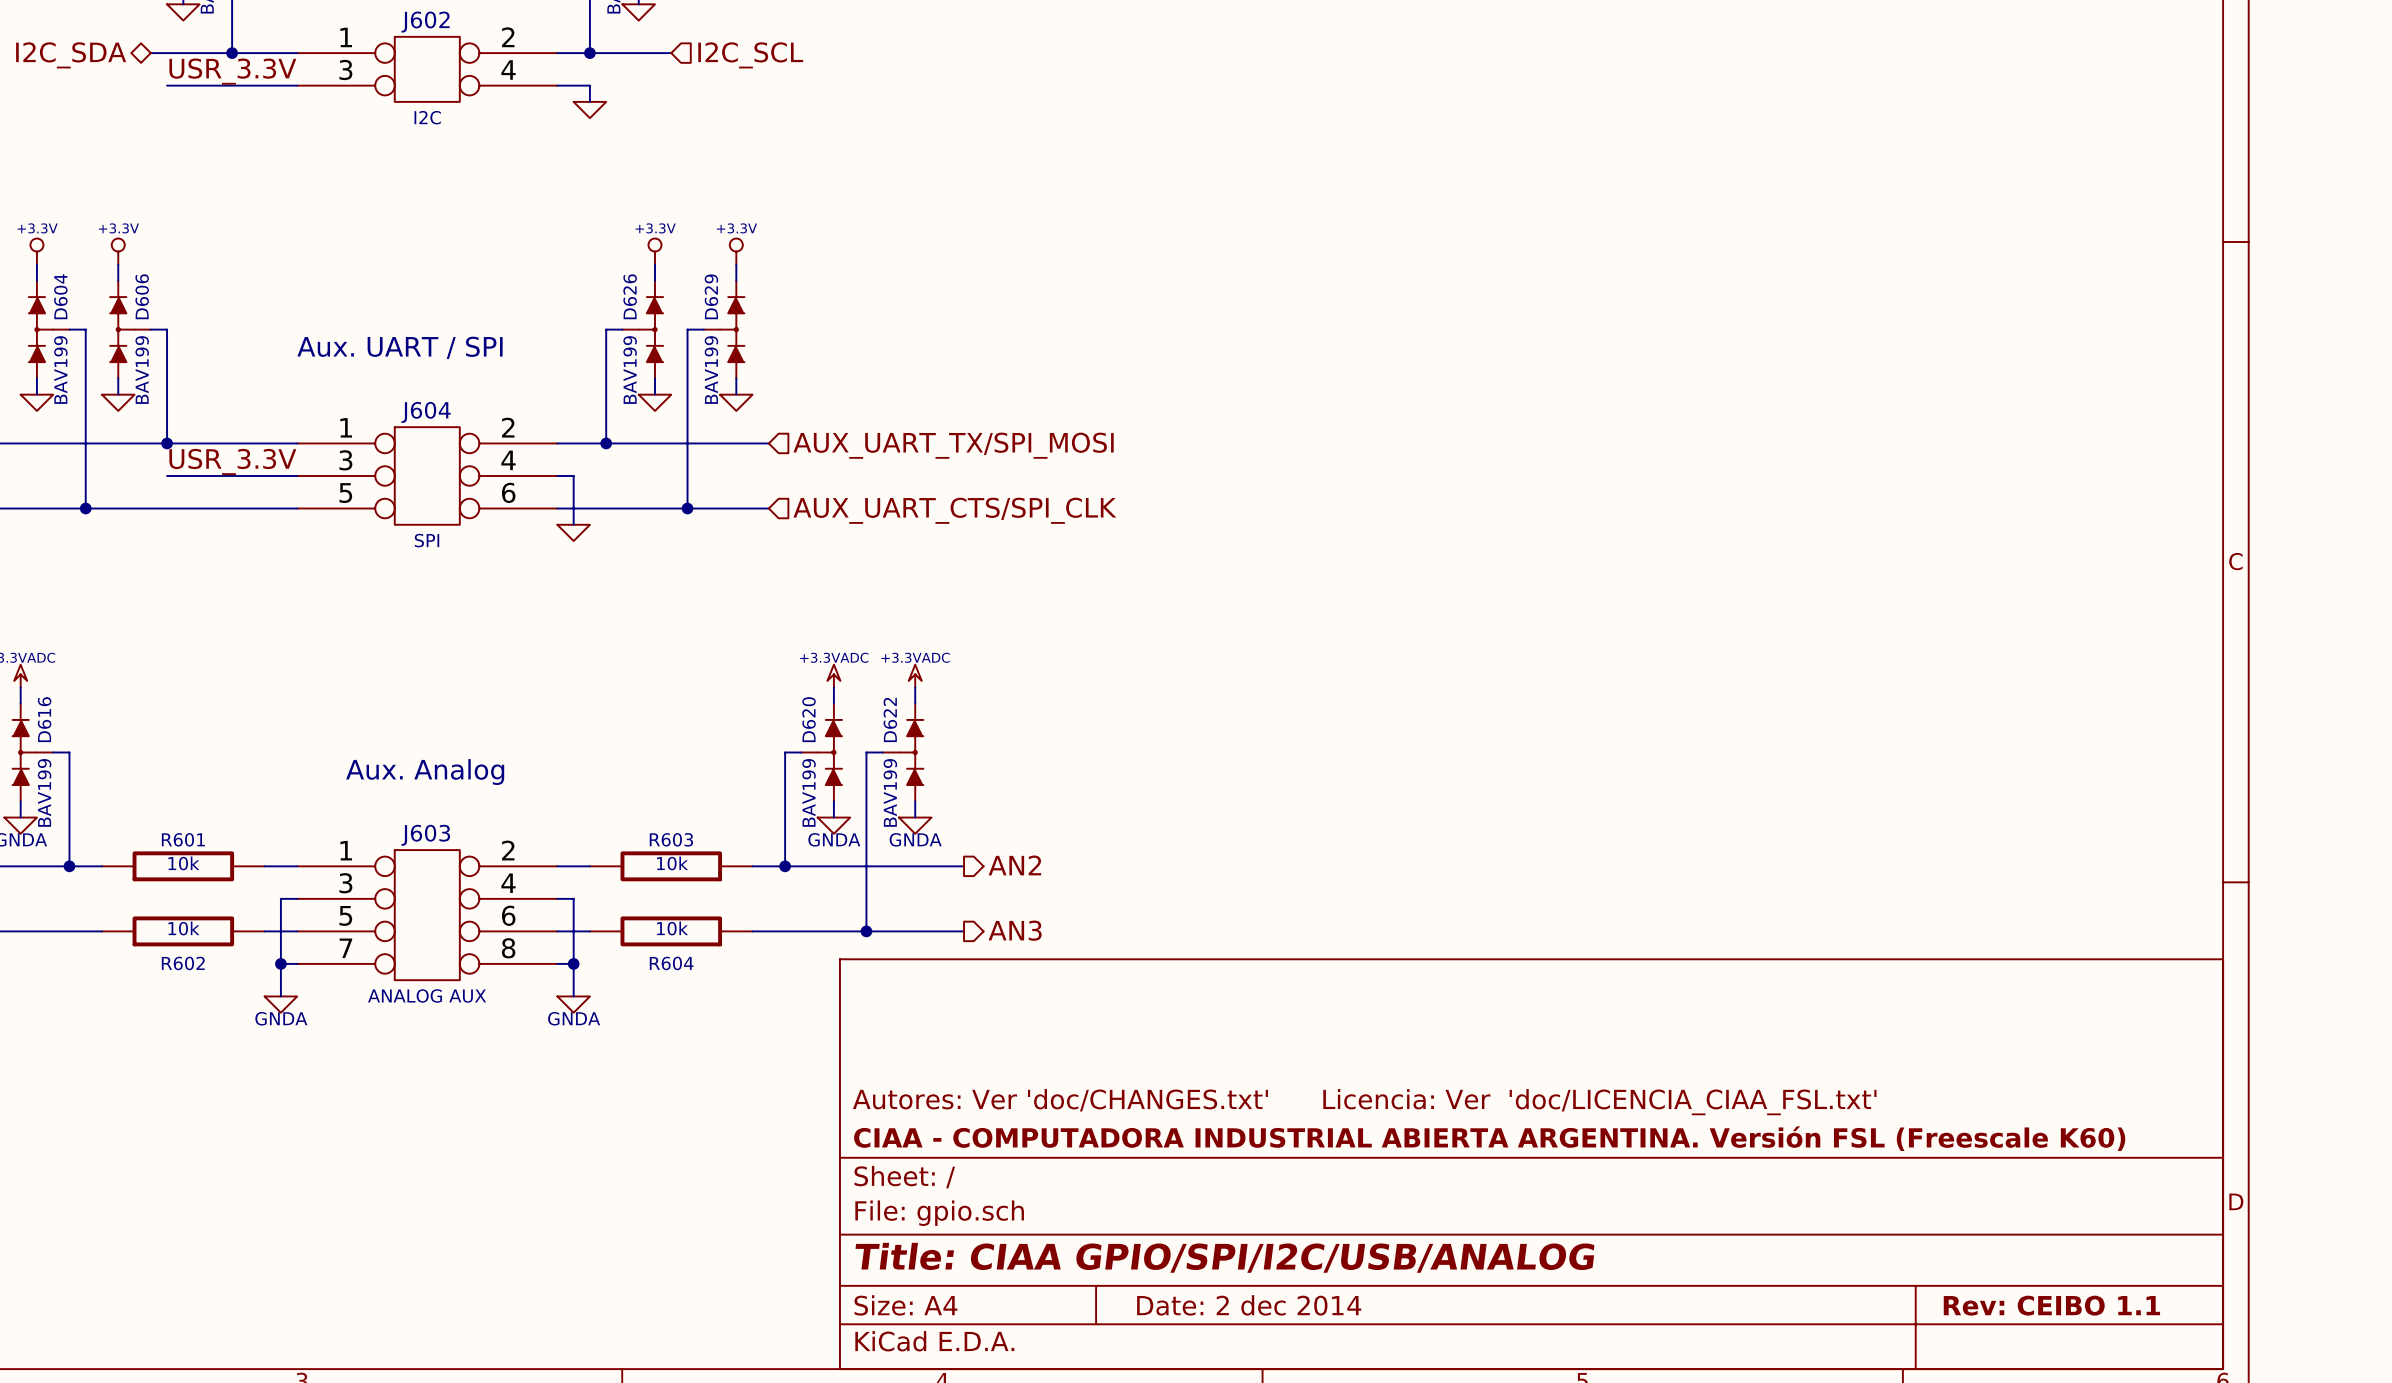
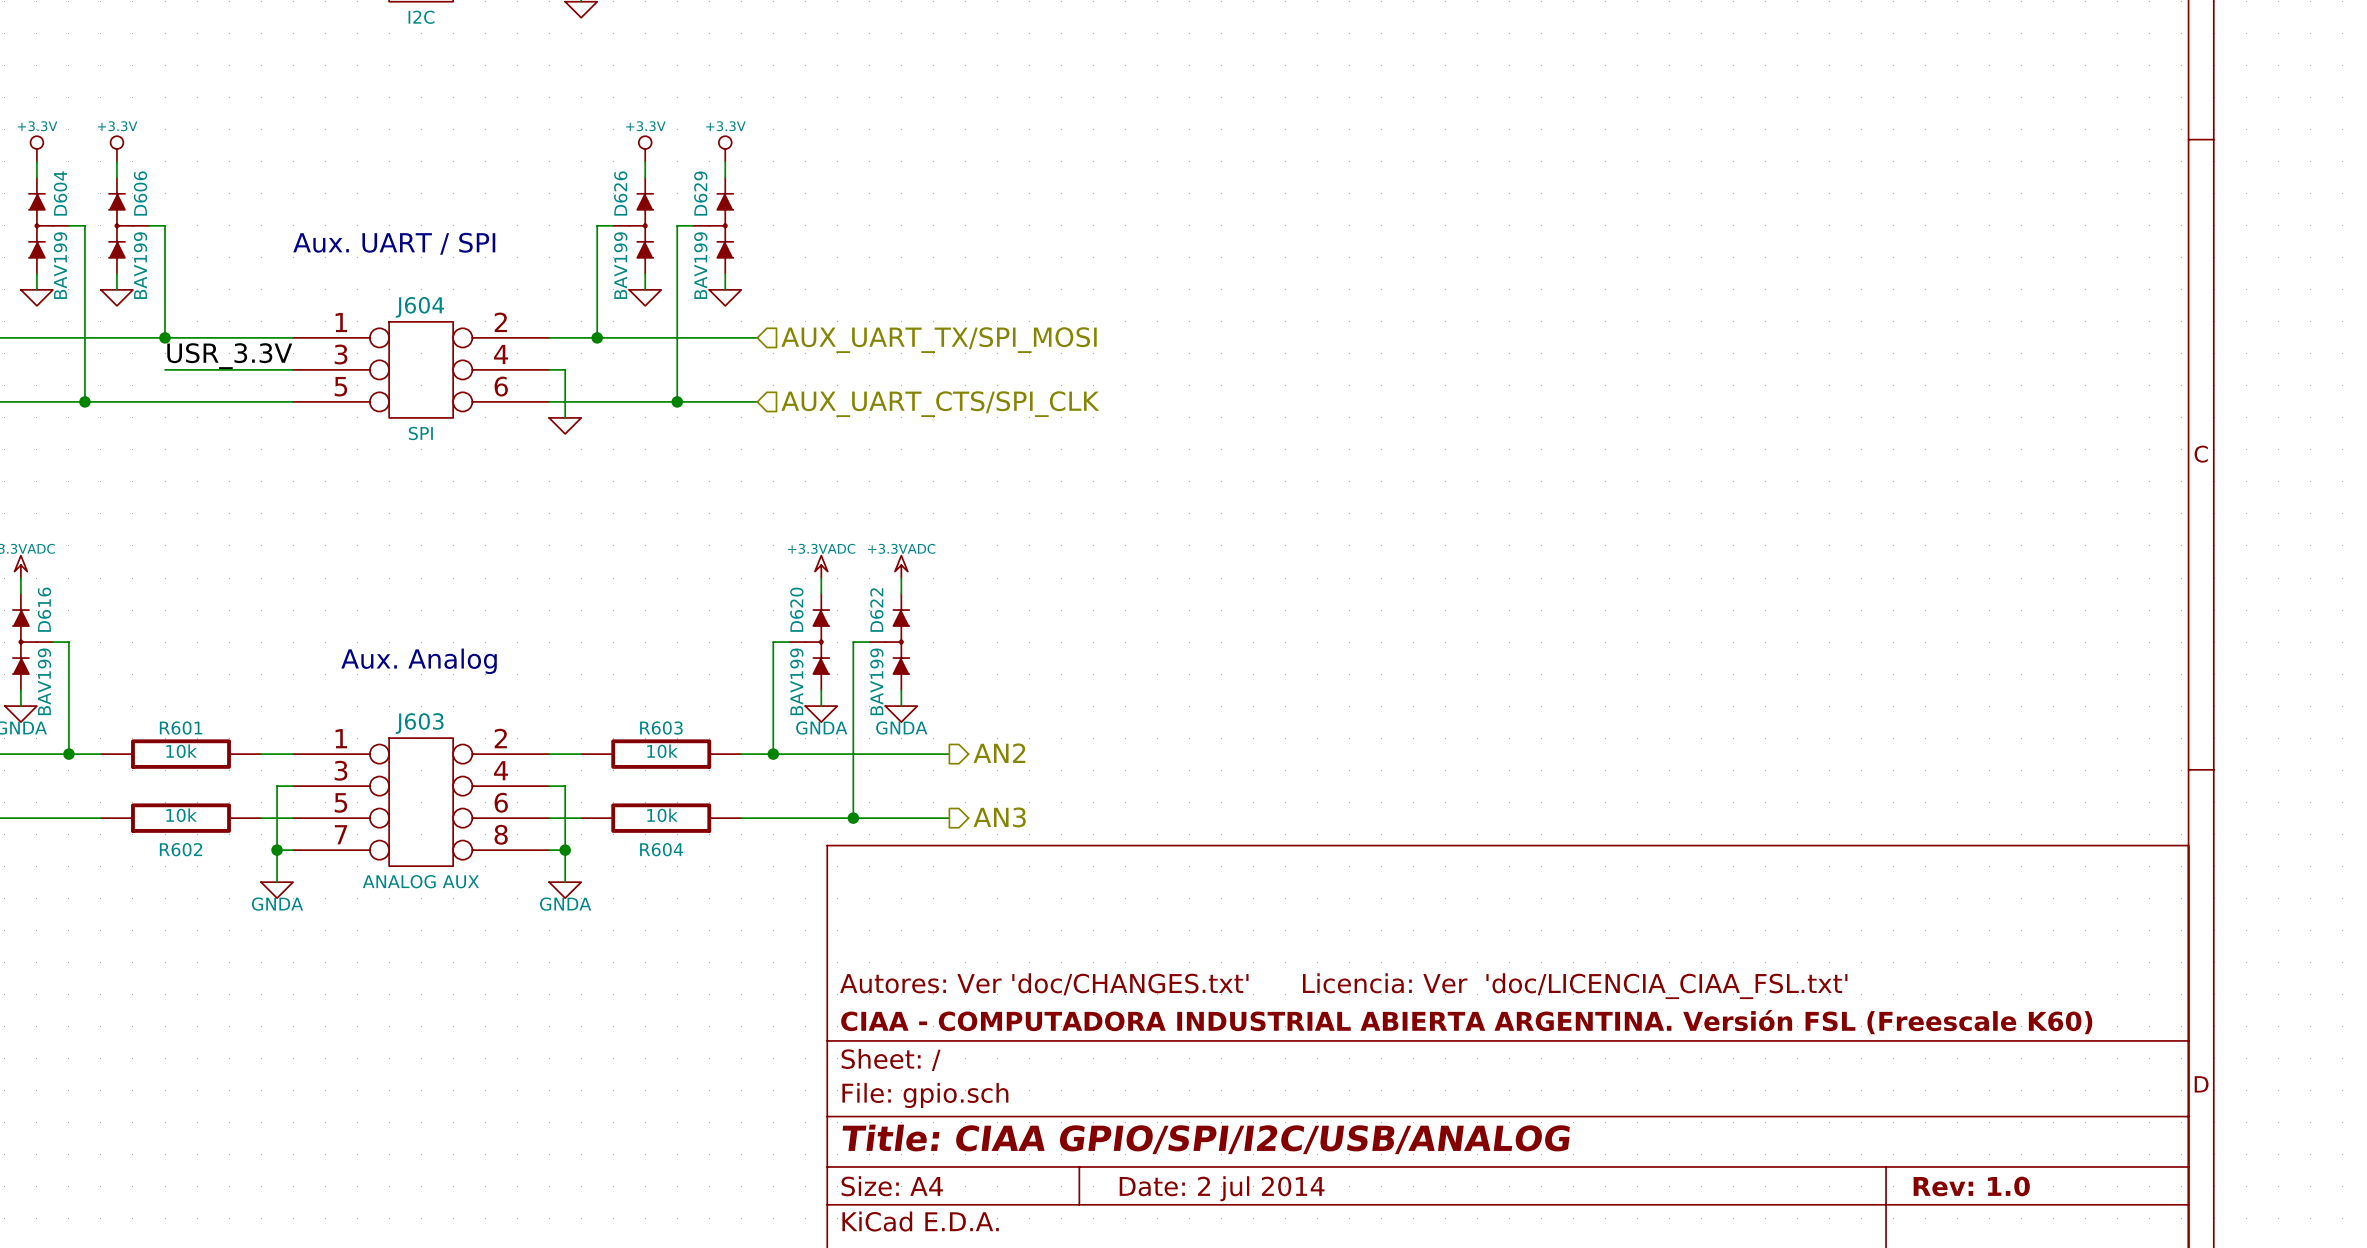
title block: Date: 2 dec 2014 (1249, 1305) -> Date: 2 jul 2014 (1222, 1188)
title block: Rev: CEIBO 1.1 (2051, 1305) -> Rev: 1.0 (1971, 1186)

